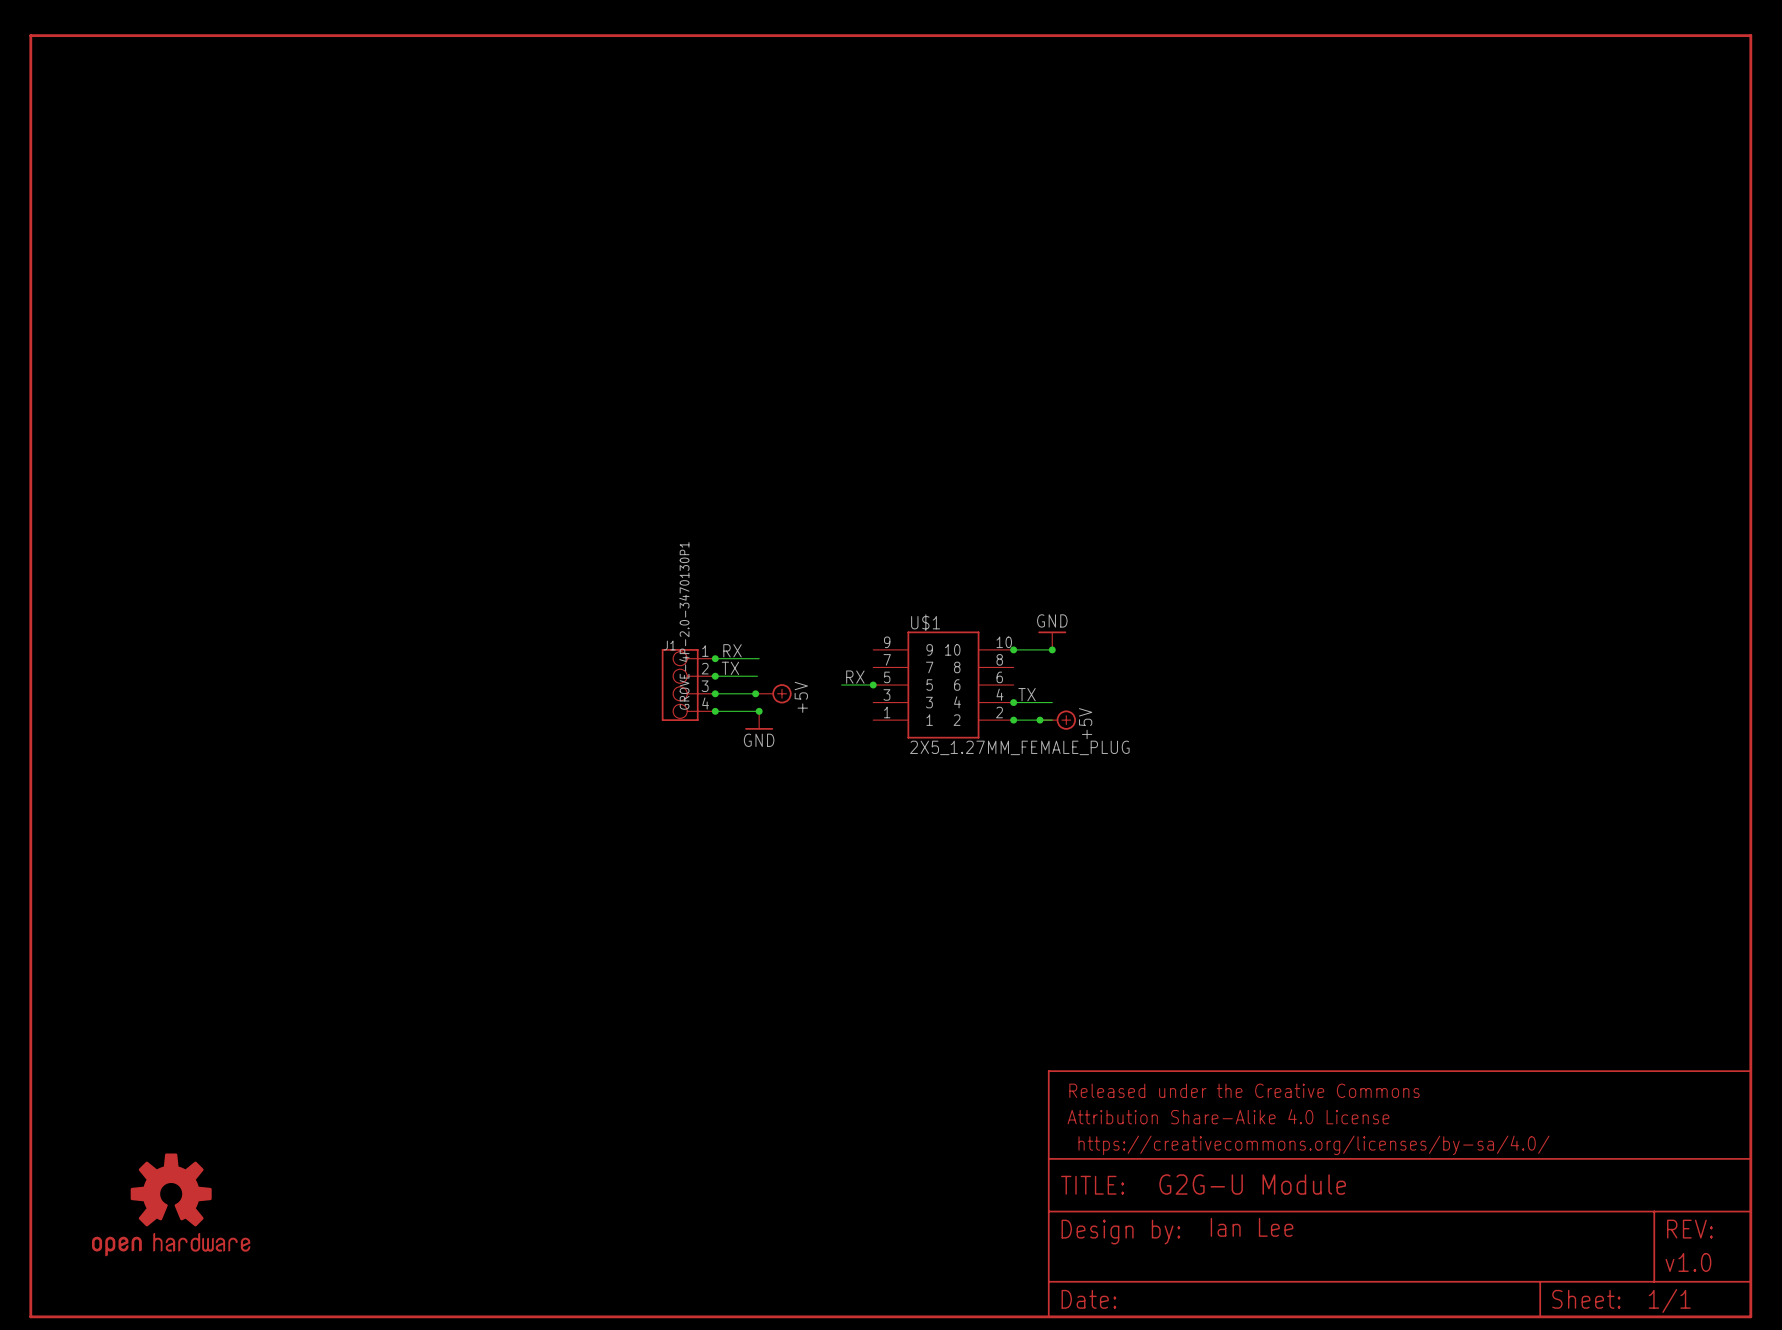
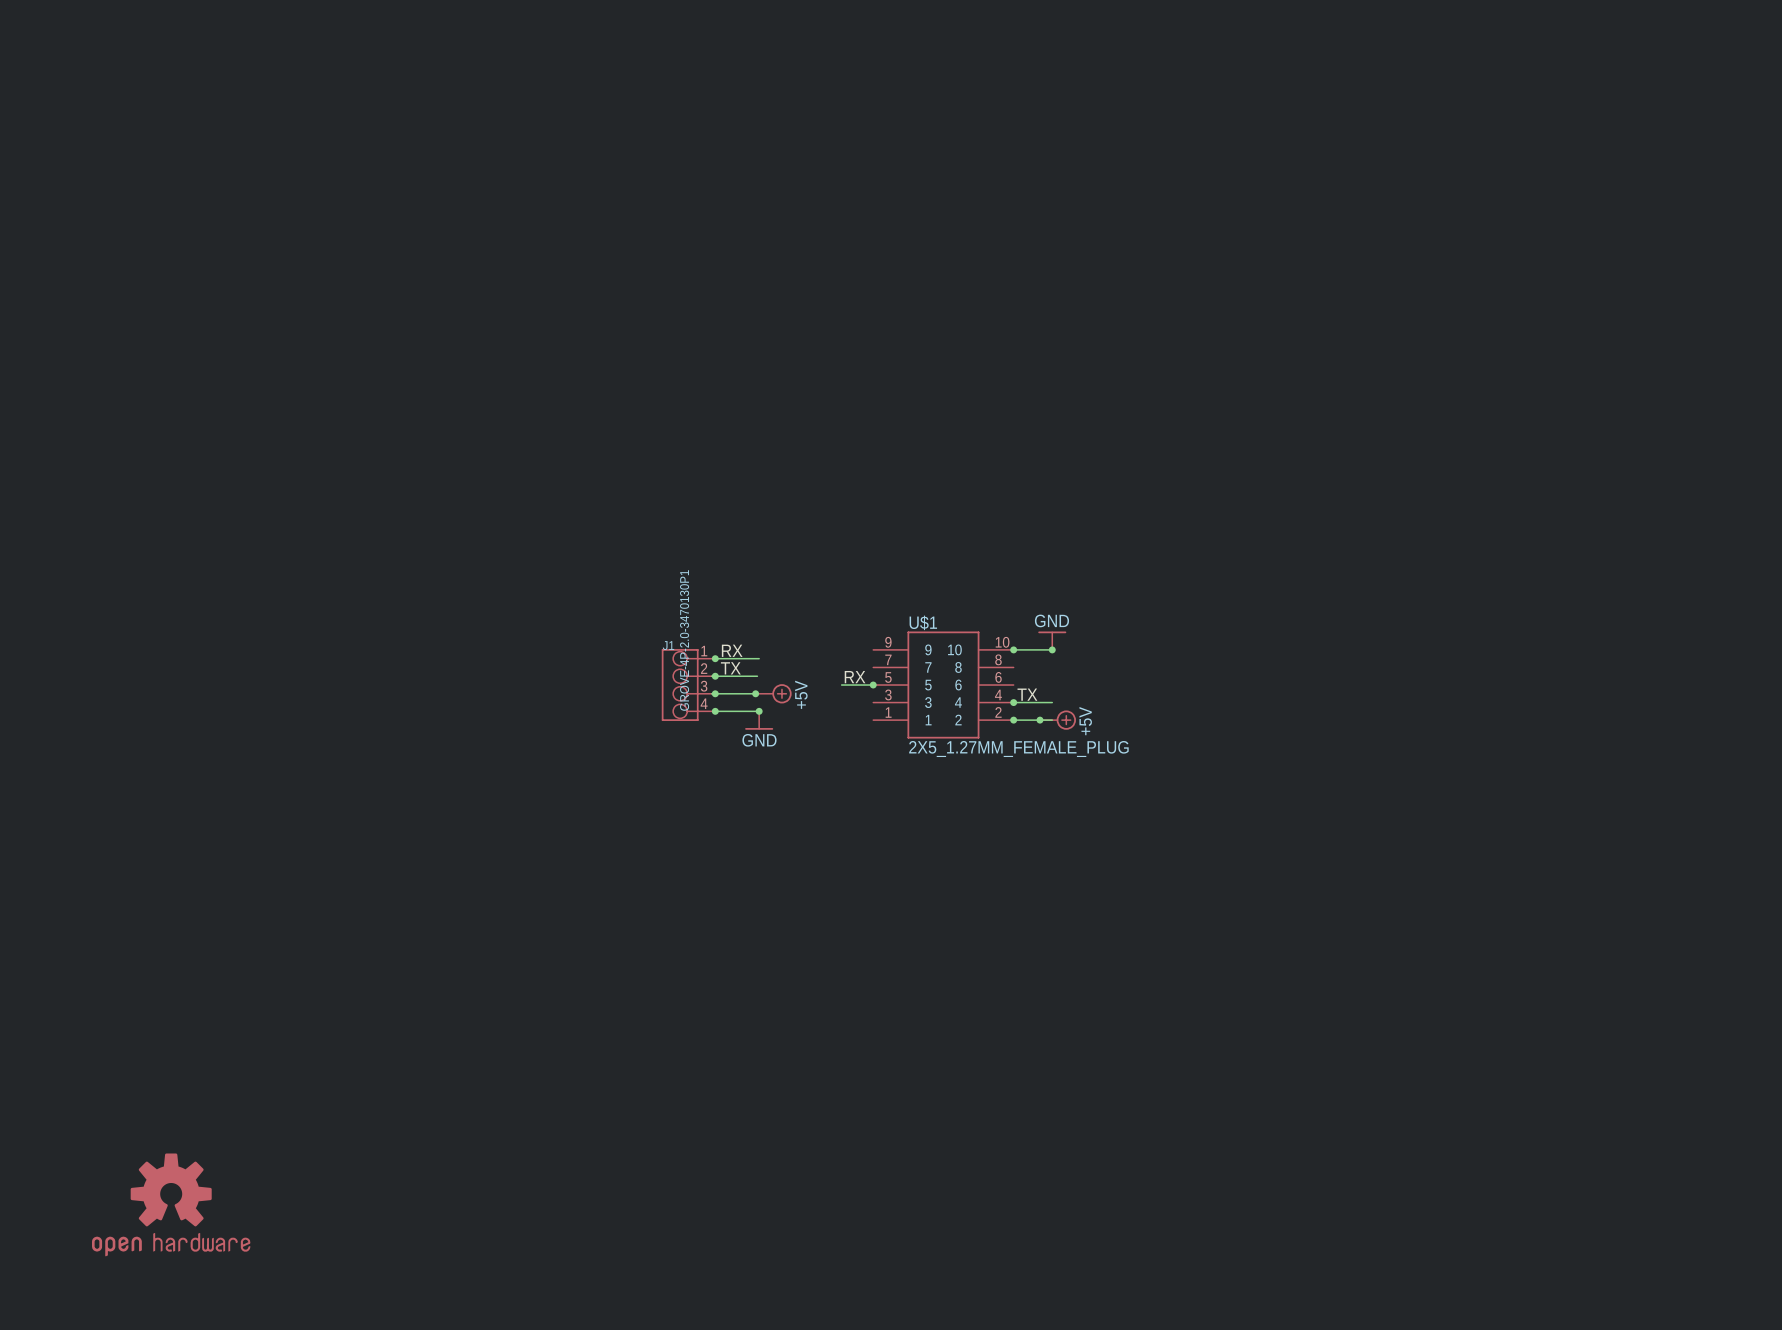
part: (890, 676) -> none
part: (1399, 1194) -> none

